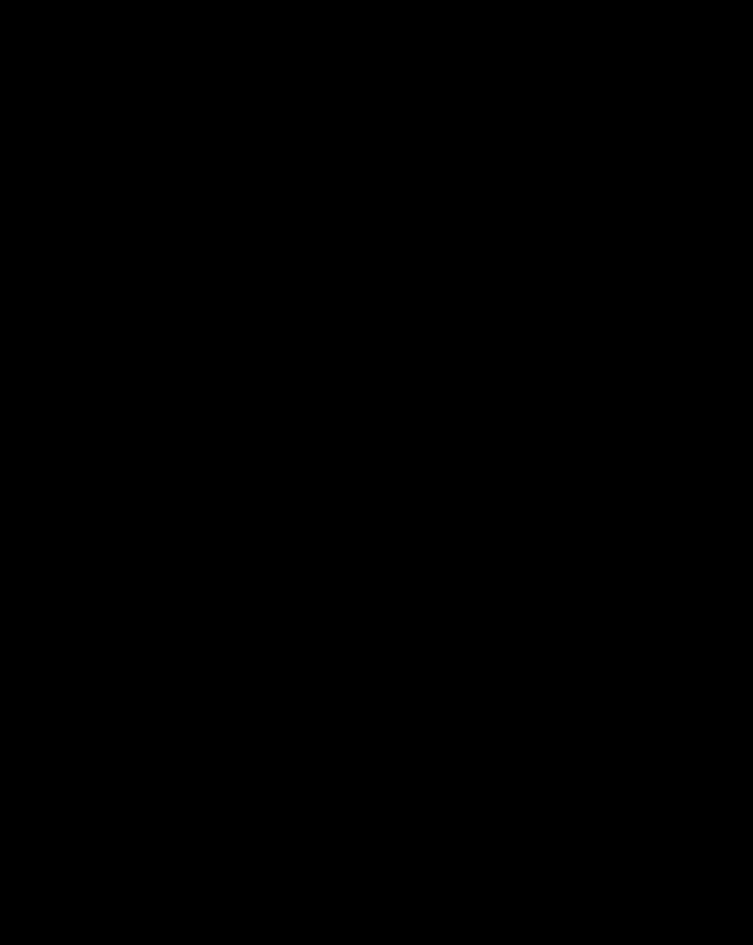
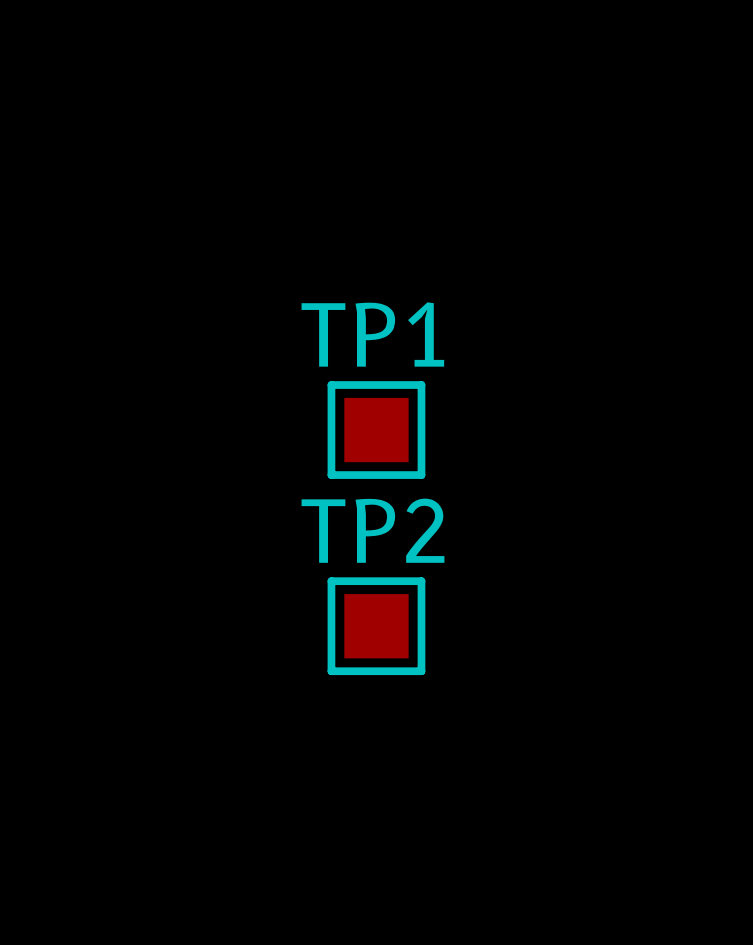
TP1: none -> (376, 430)
TP2: none -> (376, 626)

